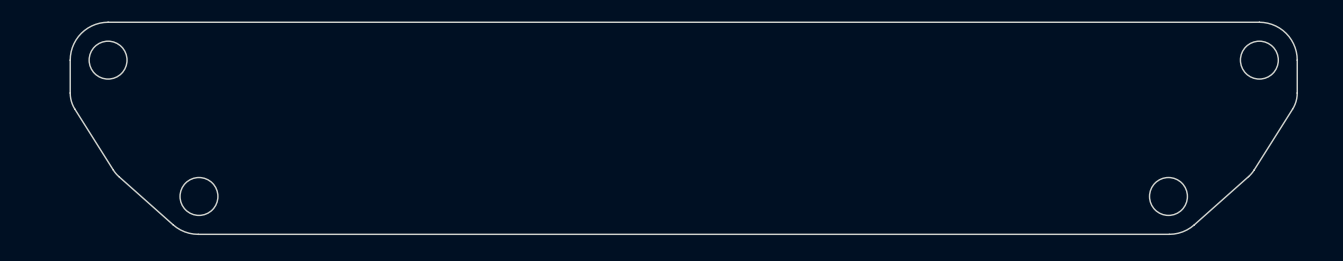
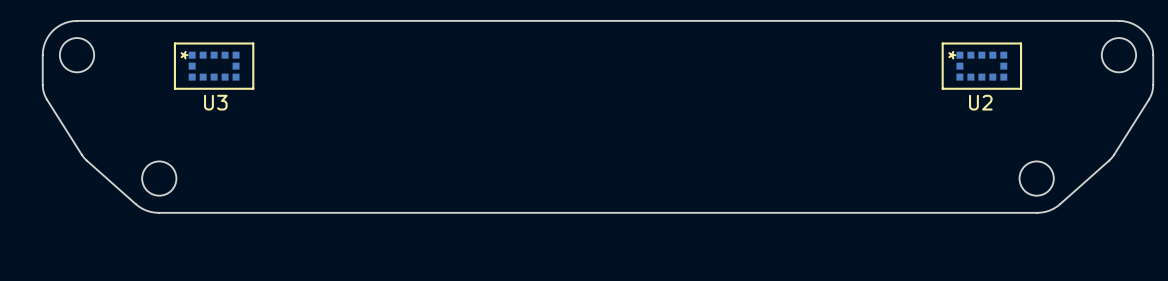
U3: none -> (214, 66)
U2: none -> (981, 66)

